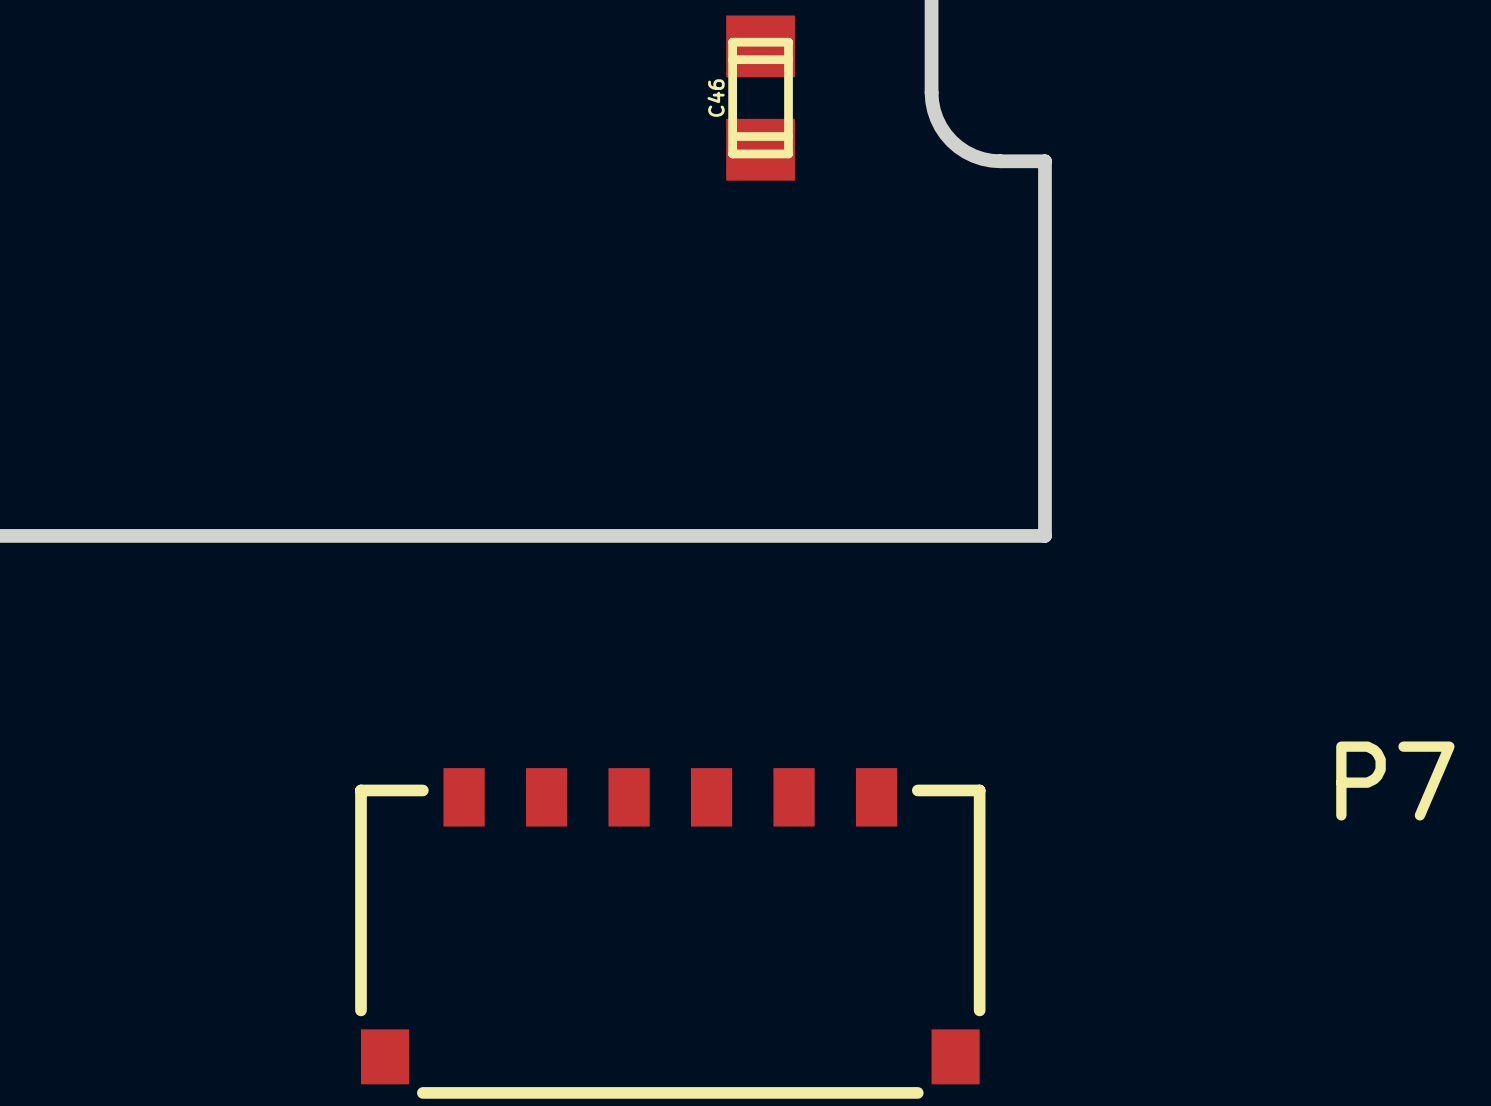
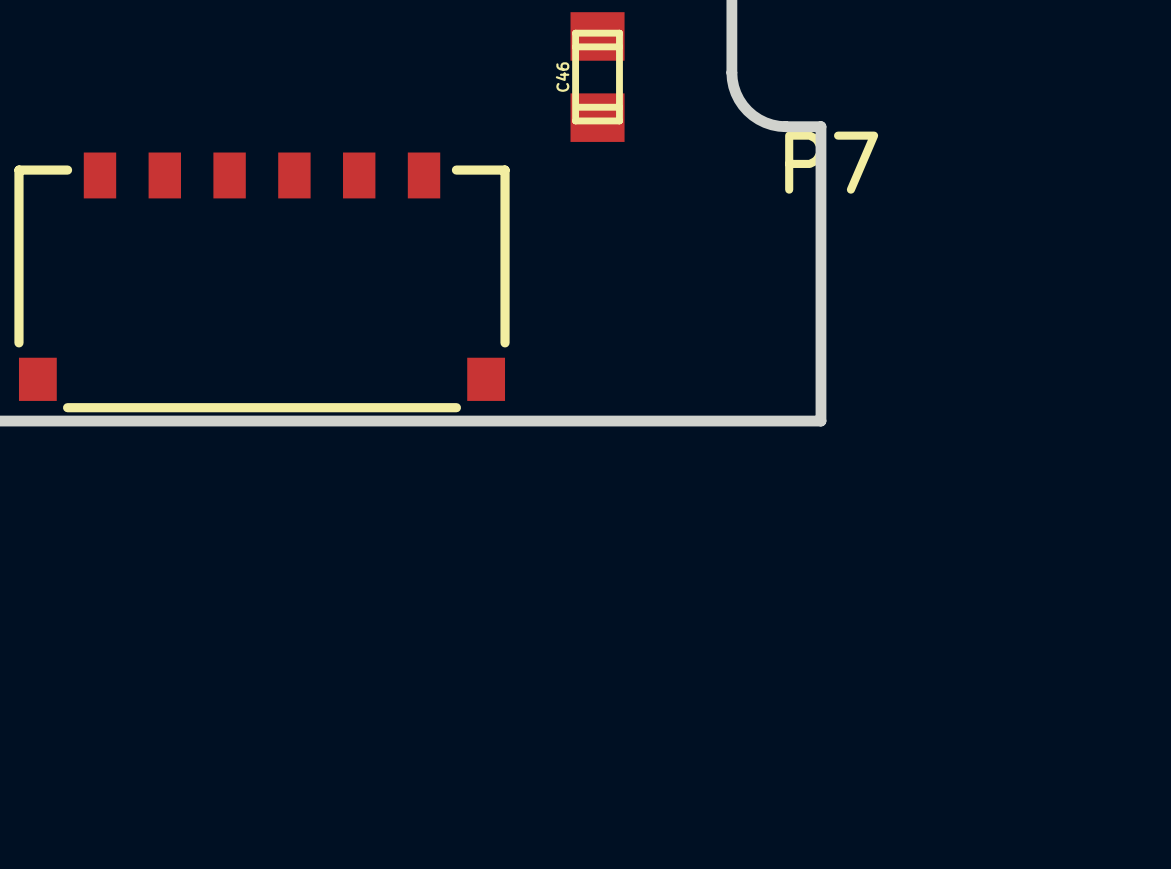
P7 position: (670, 933) -> (262, 282)

